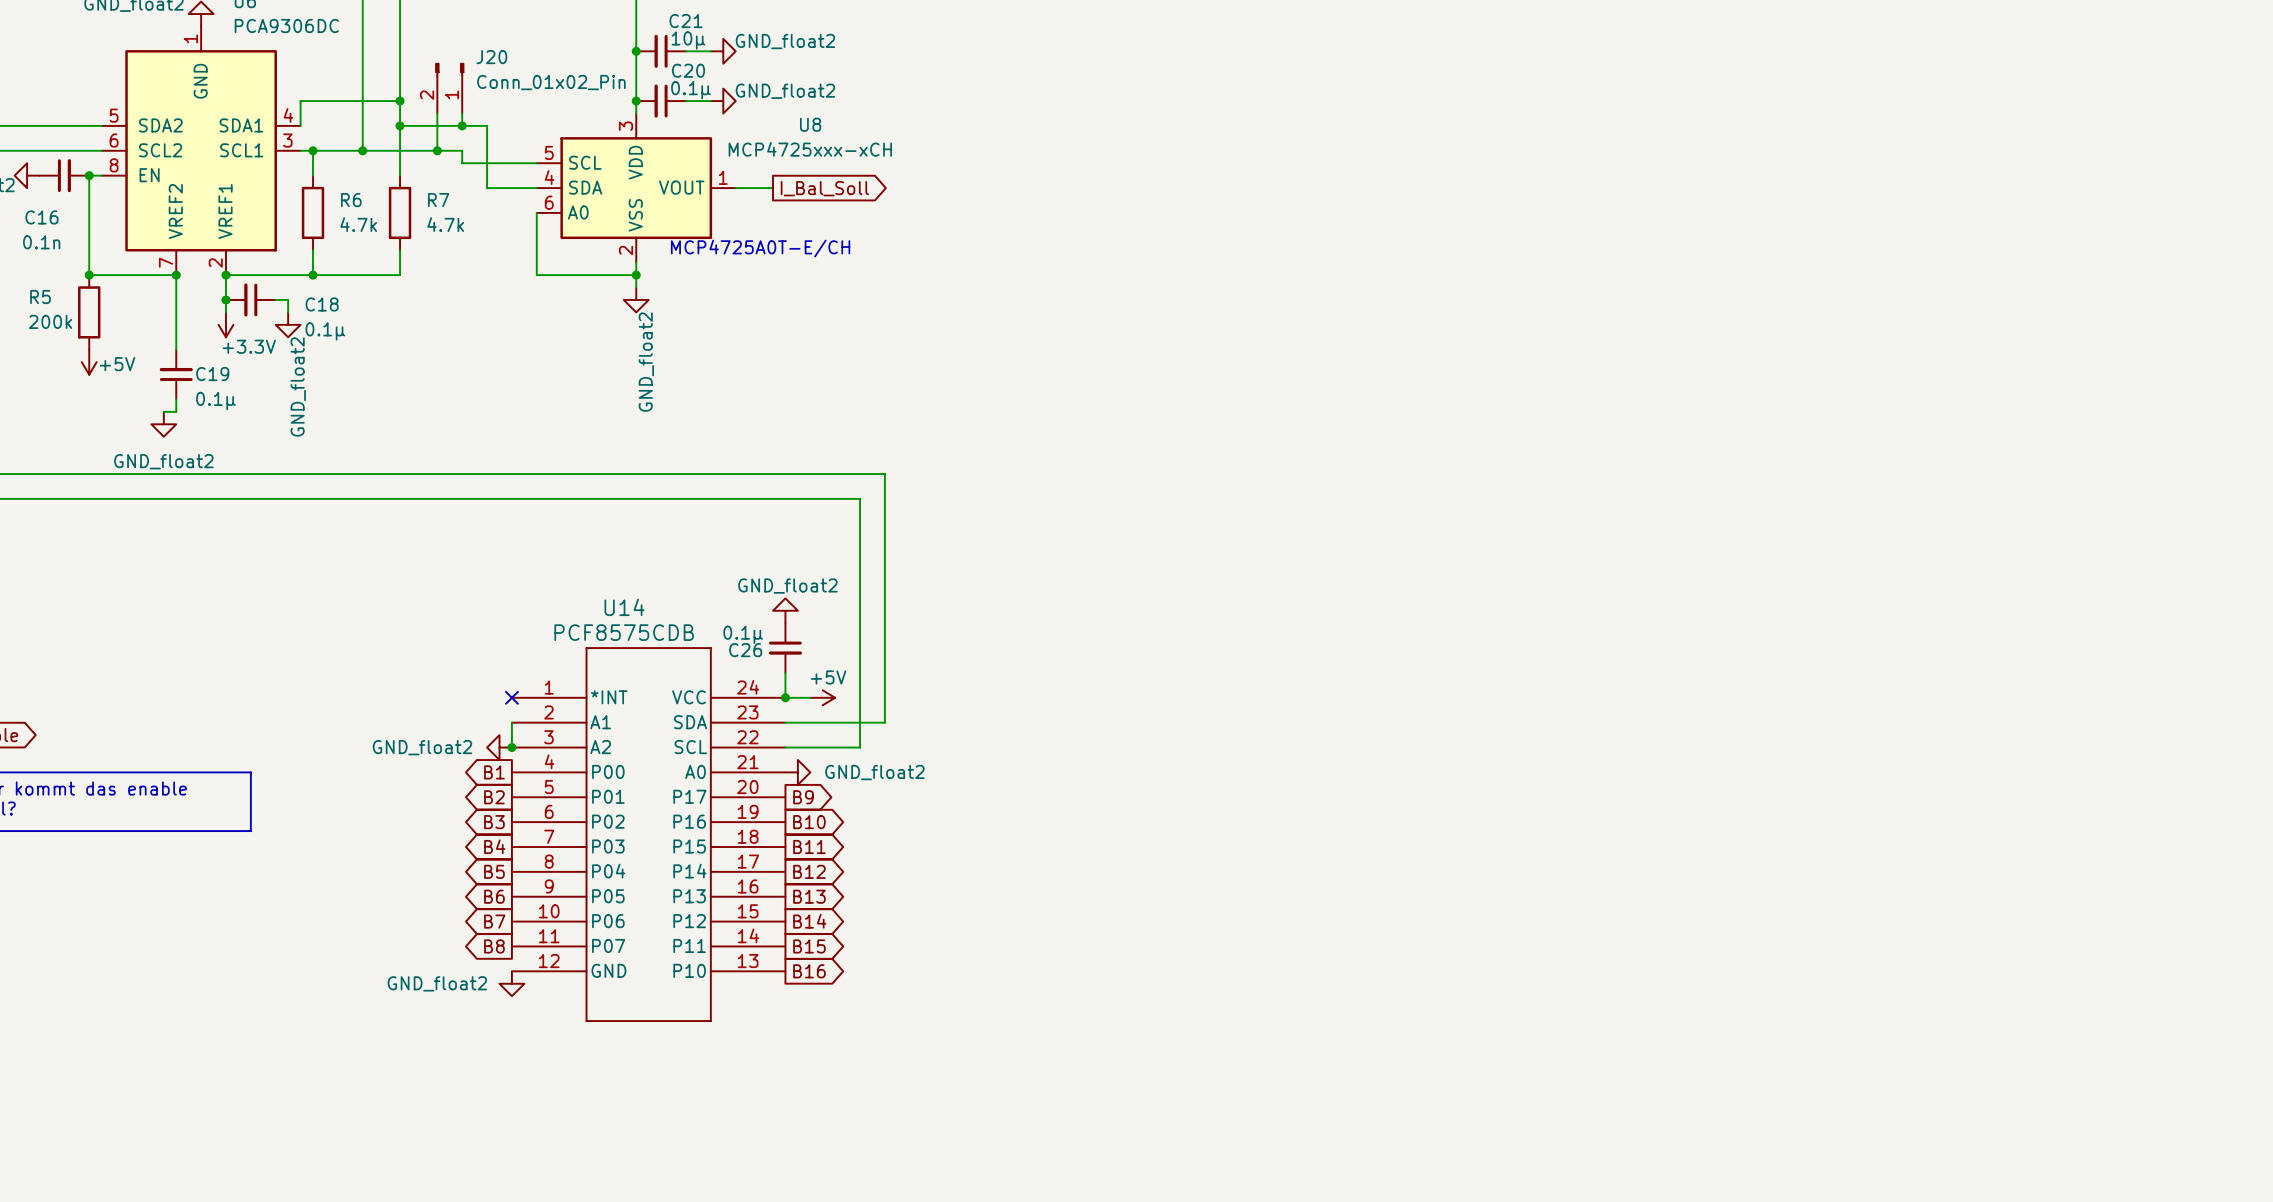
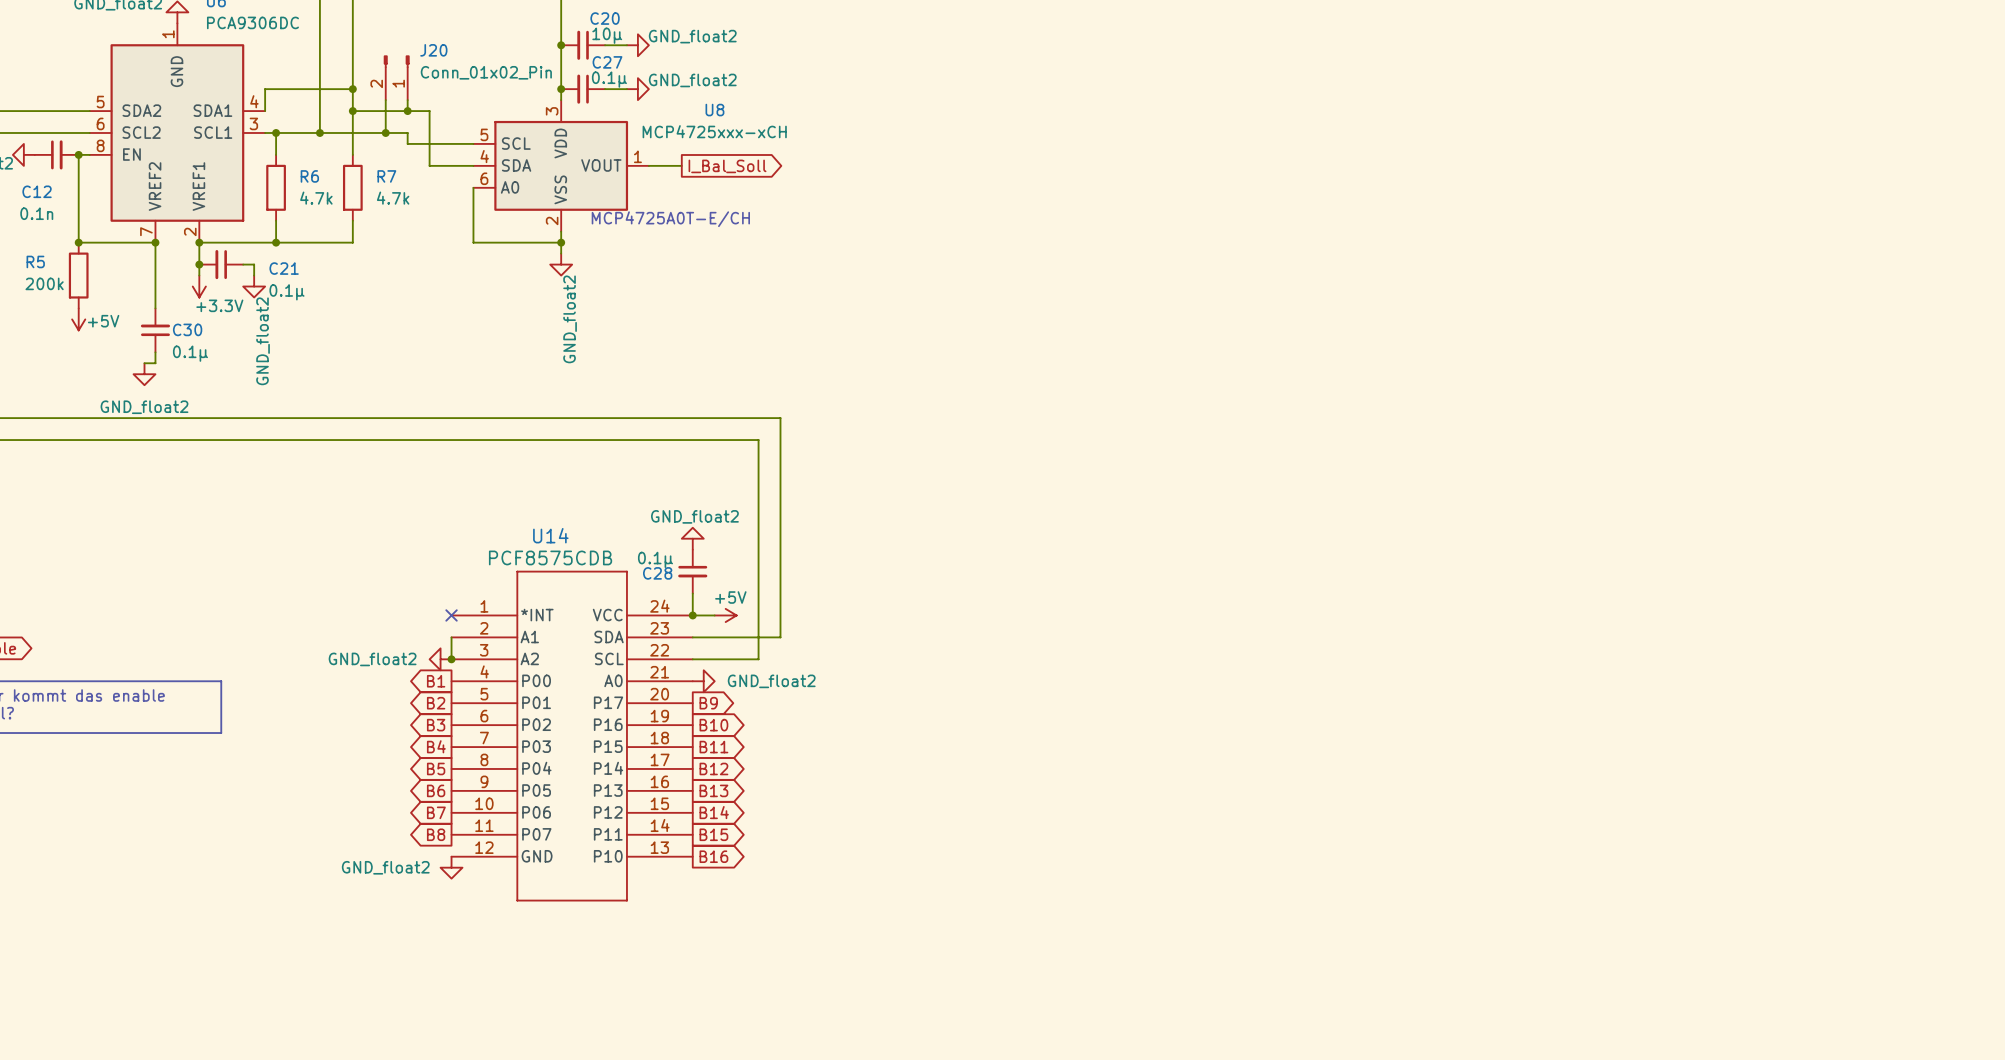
C21 name: C21 (685, 21) -> C20 (605, 18)
C20 name: C20 (688, 70) -> C27 (607, 62)
C16 name: C16 (41, 217) -> C12 (37, 191)
C18 name: C18 (322, 304) -> C21 (284, 268)
C19 name: C19 (212, 374) -> C30 (187, 329)
C26 name: C26 (745, 650) -> C28 (657, 573)

